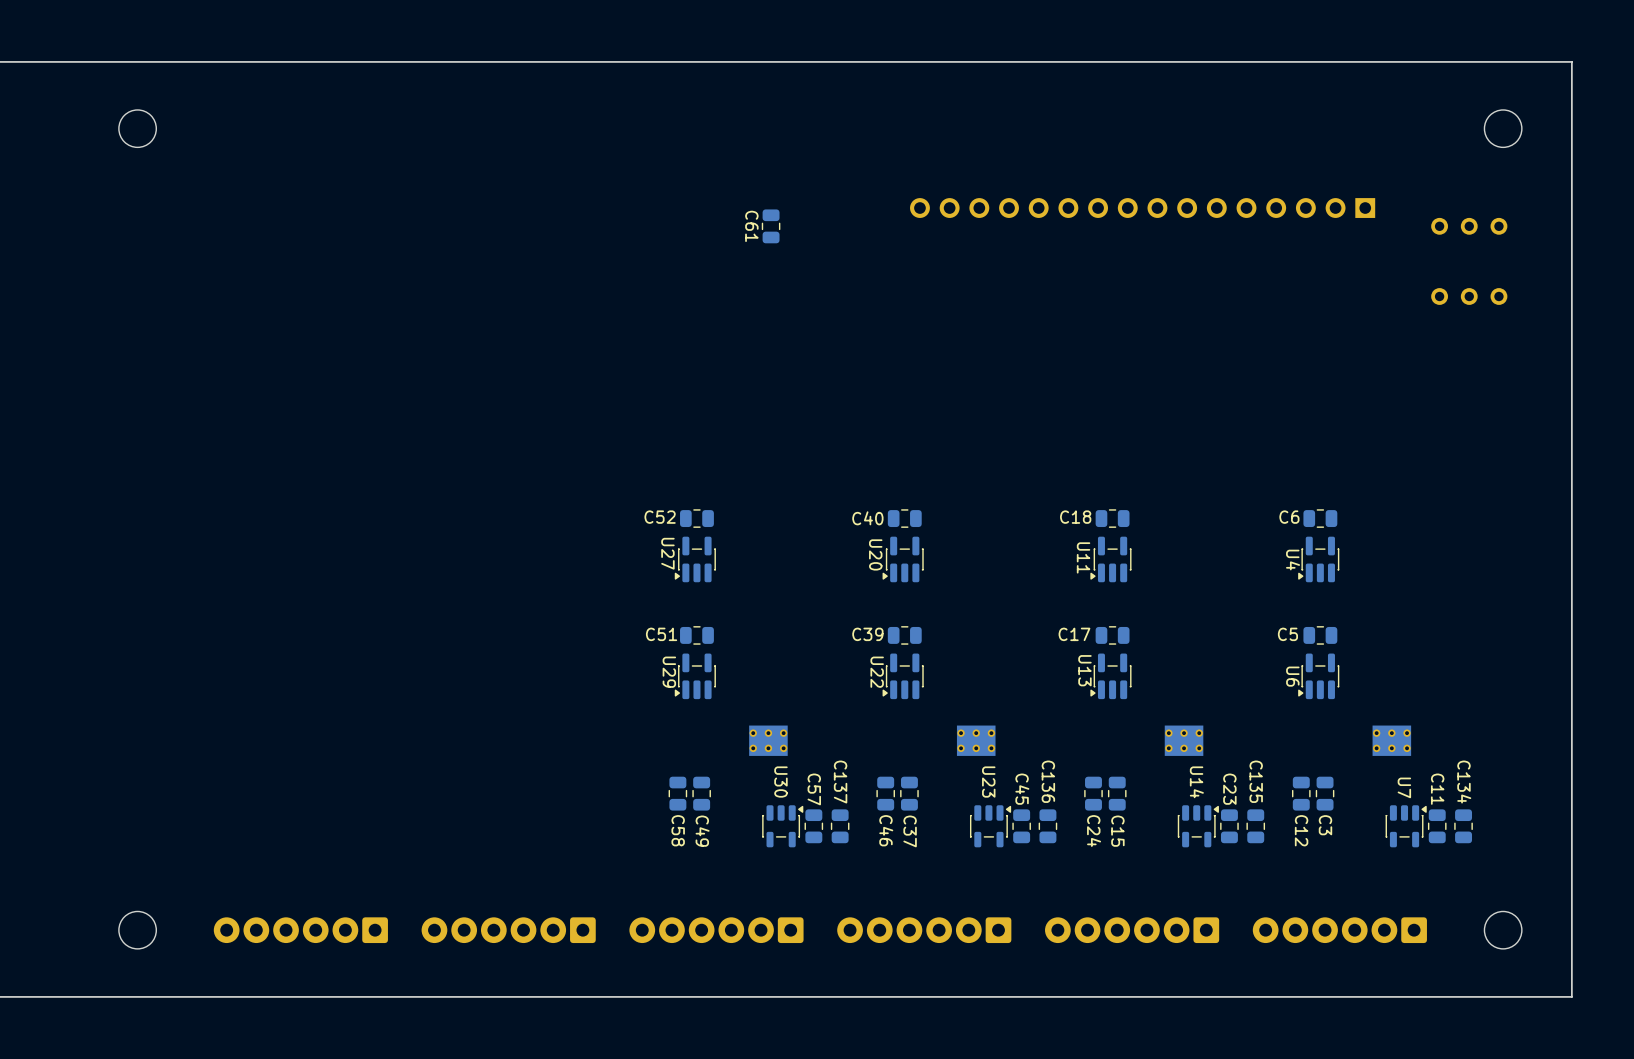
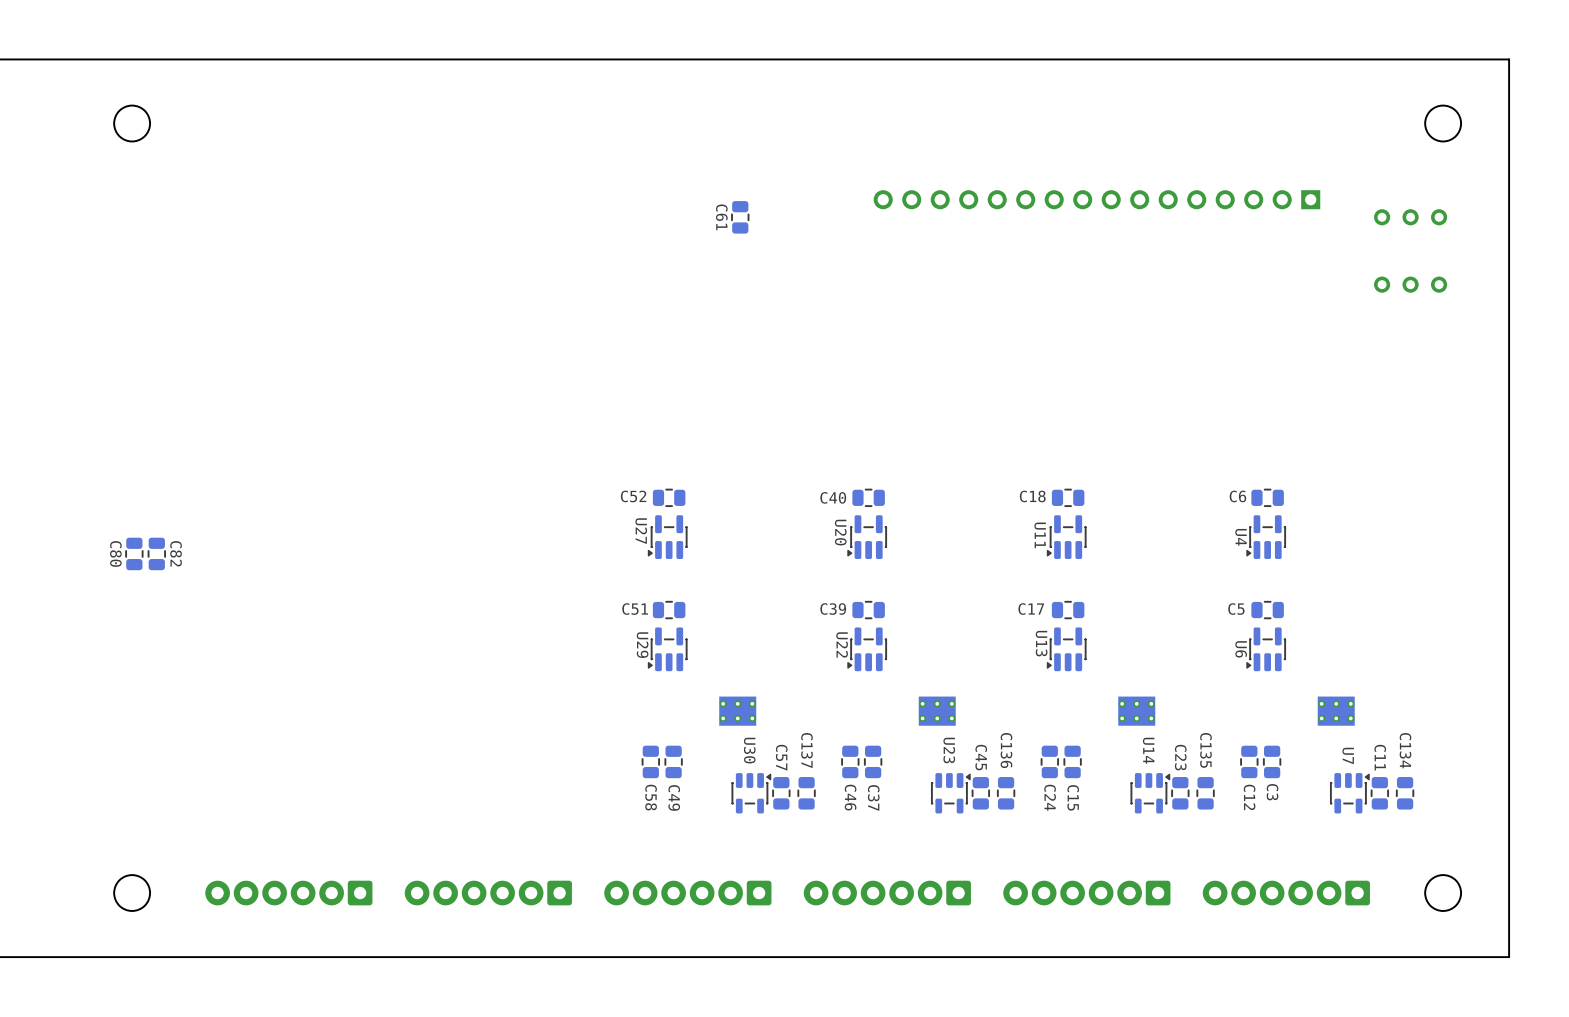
C80: none -> (134, 553)
C82: none -> (156, 553)

